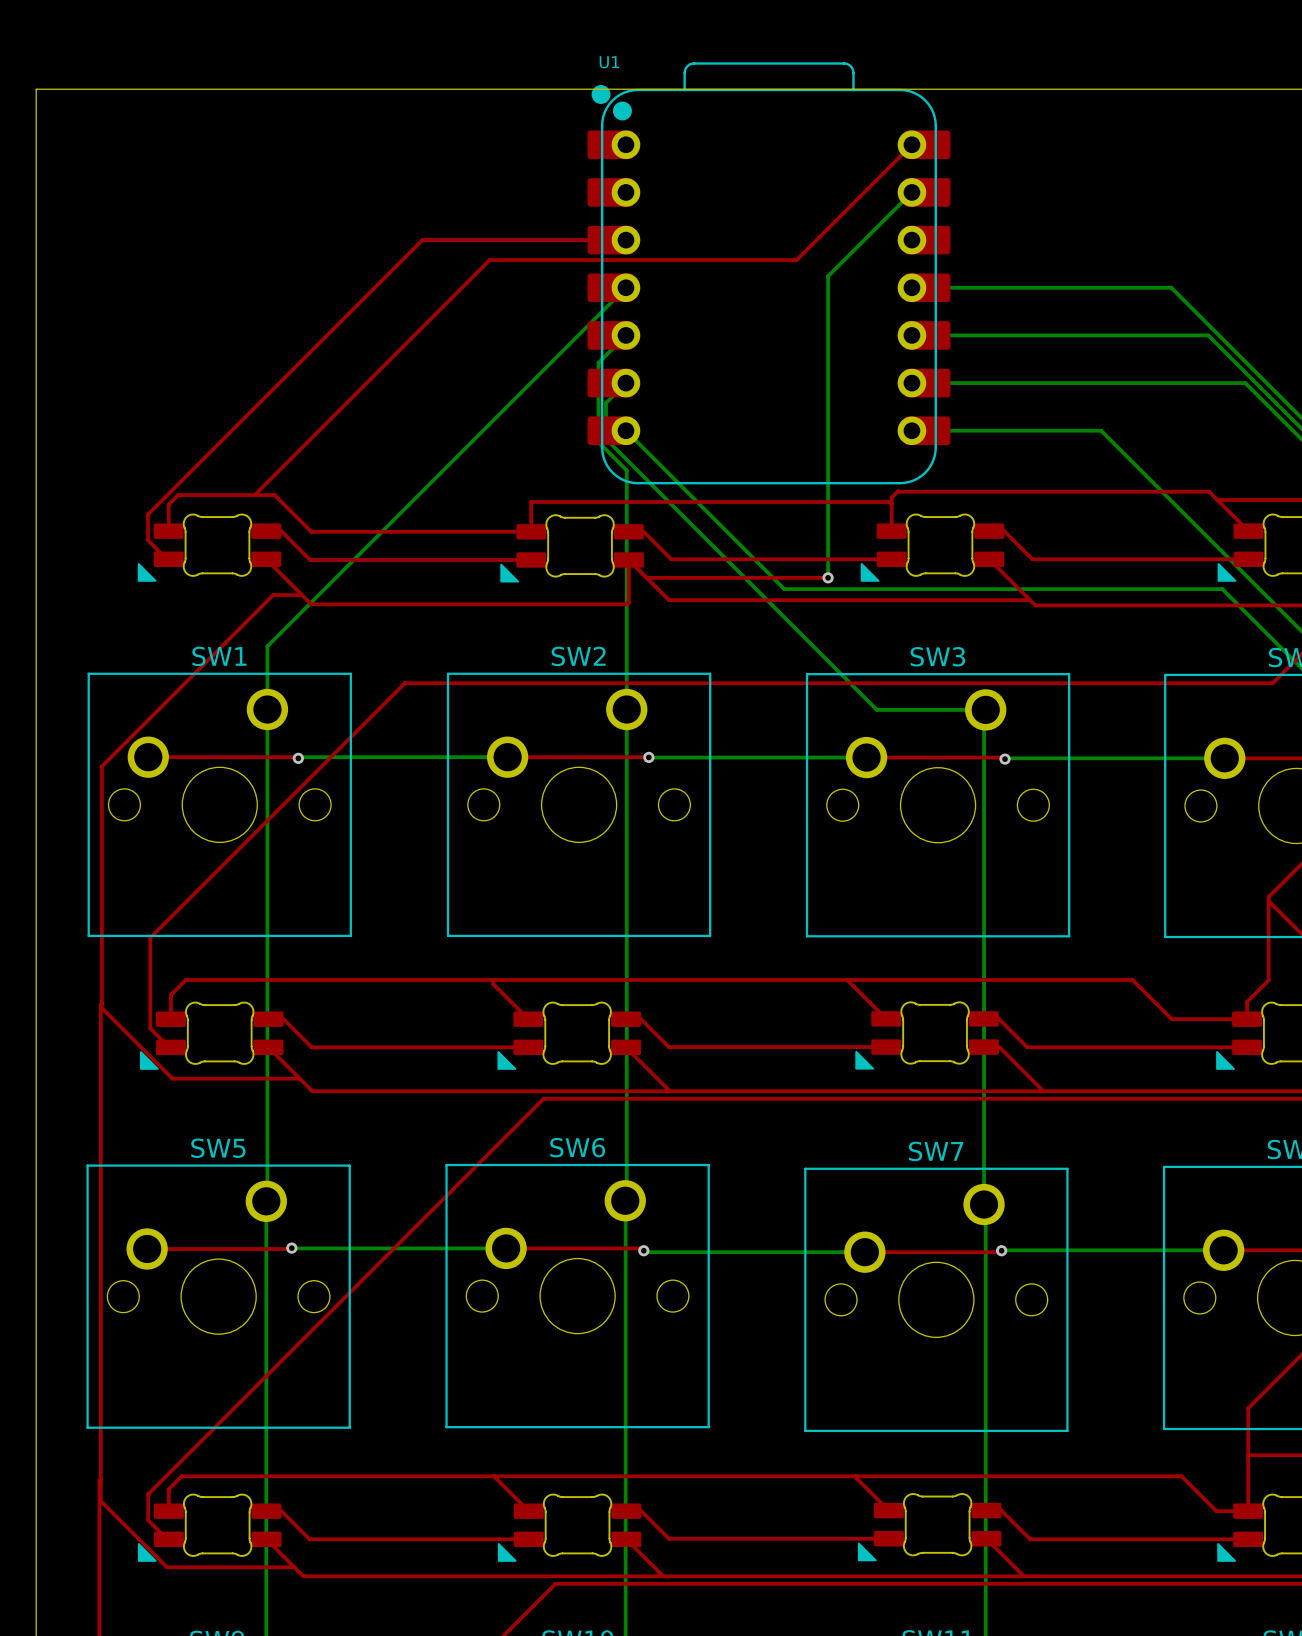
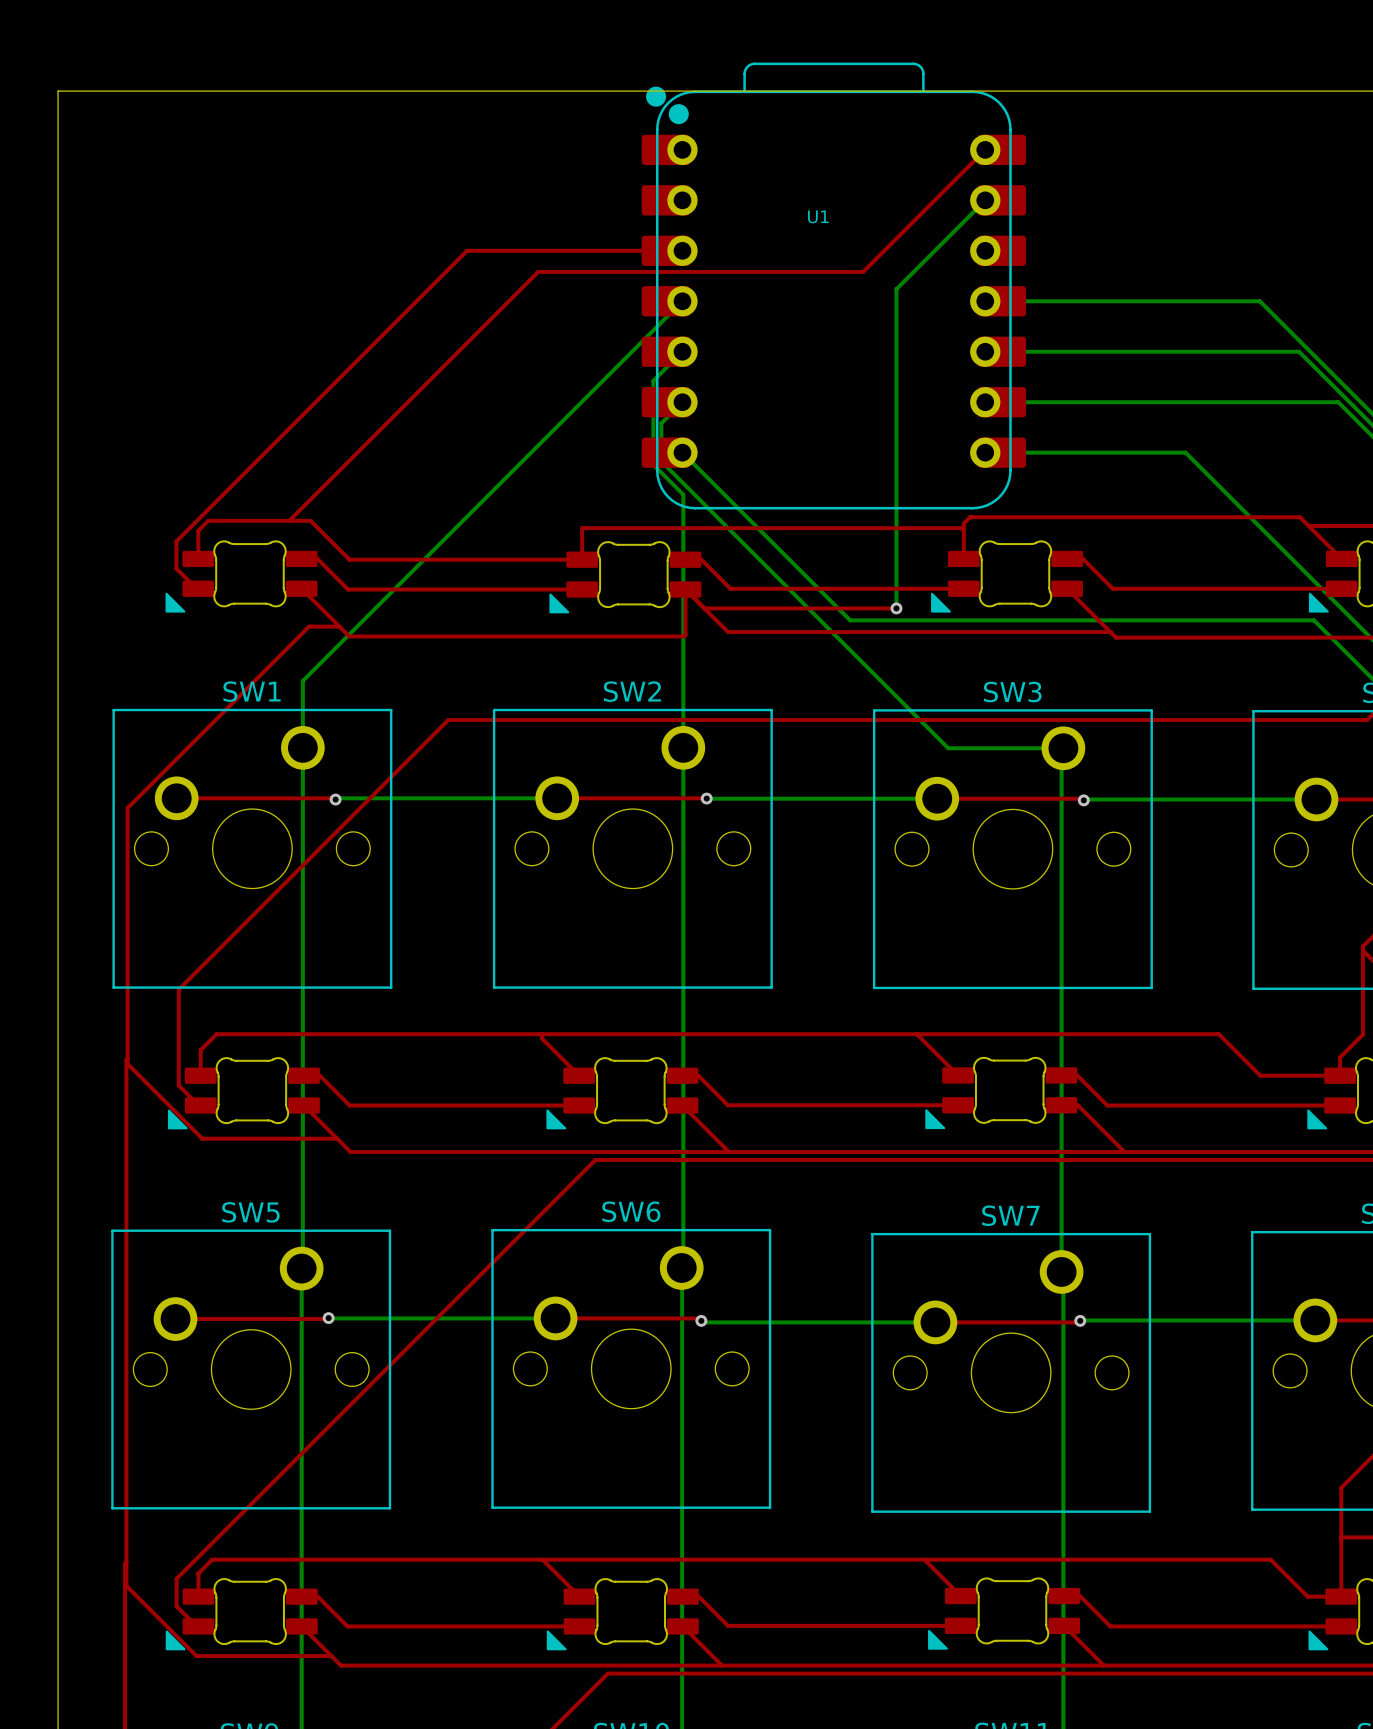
U1 name position: U1 (609, 62) -> U1 (818, 216)

